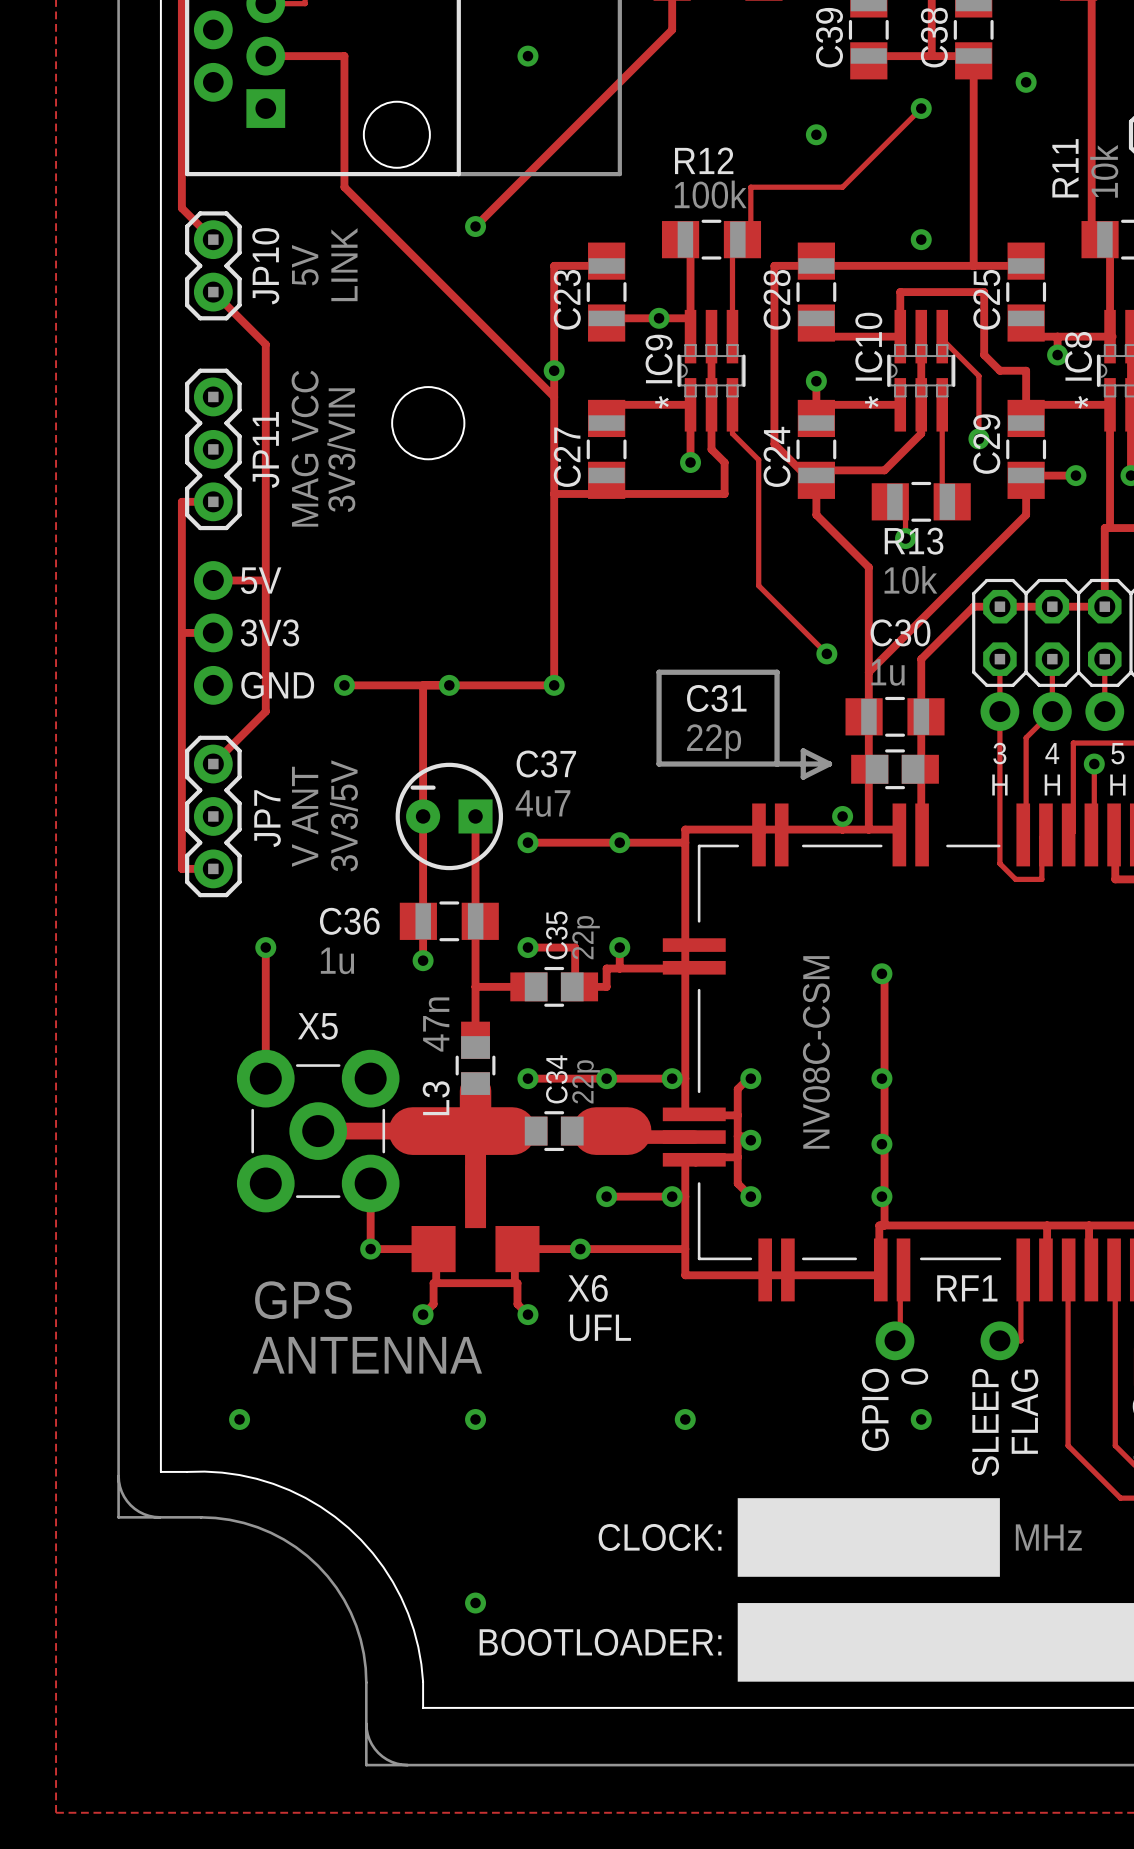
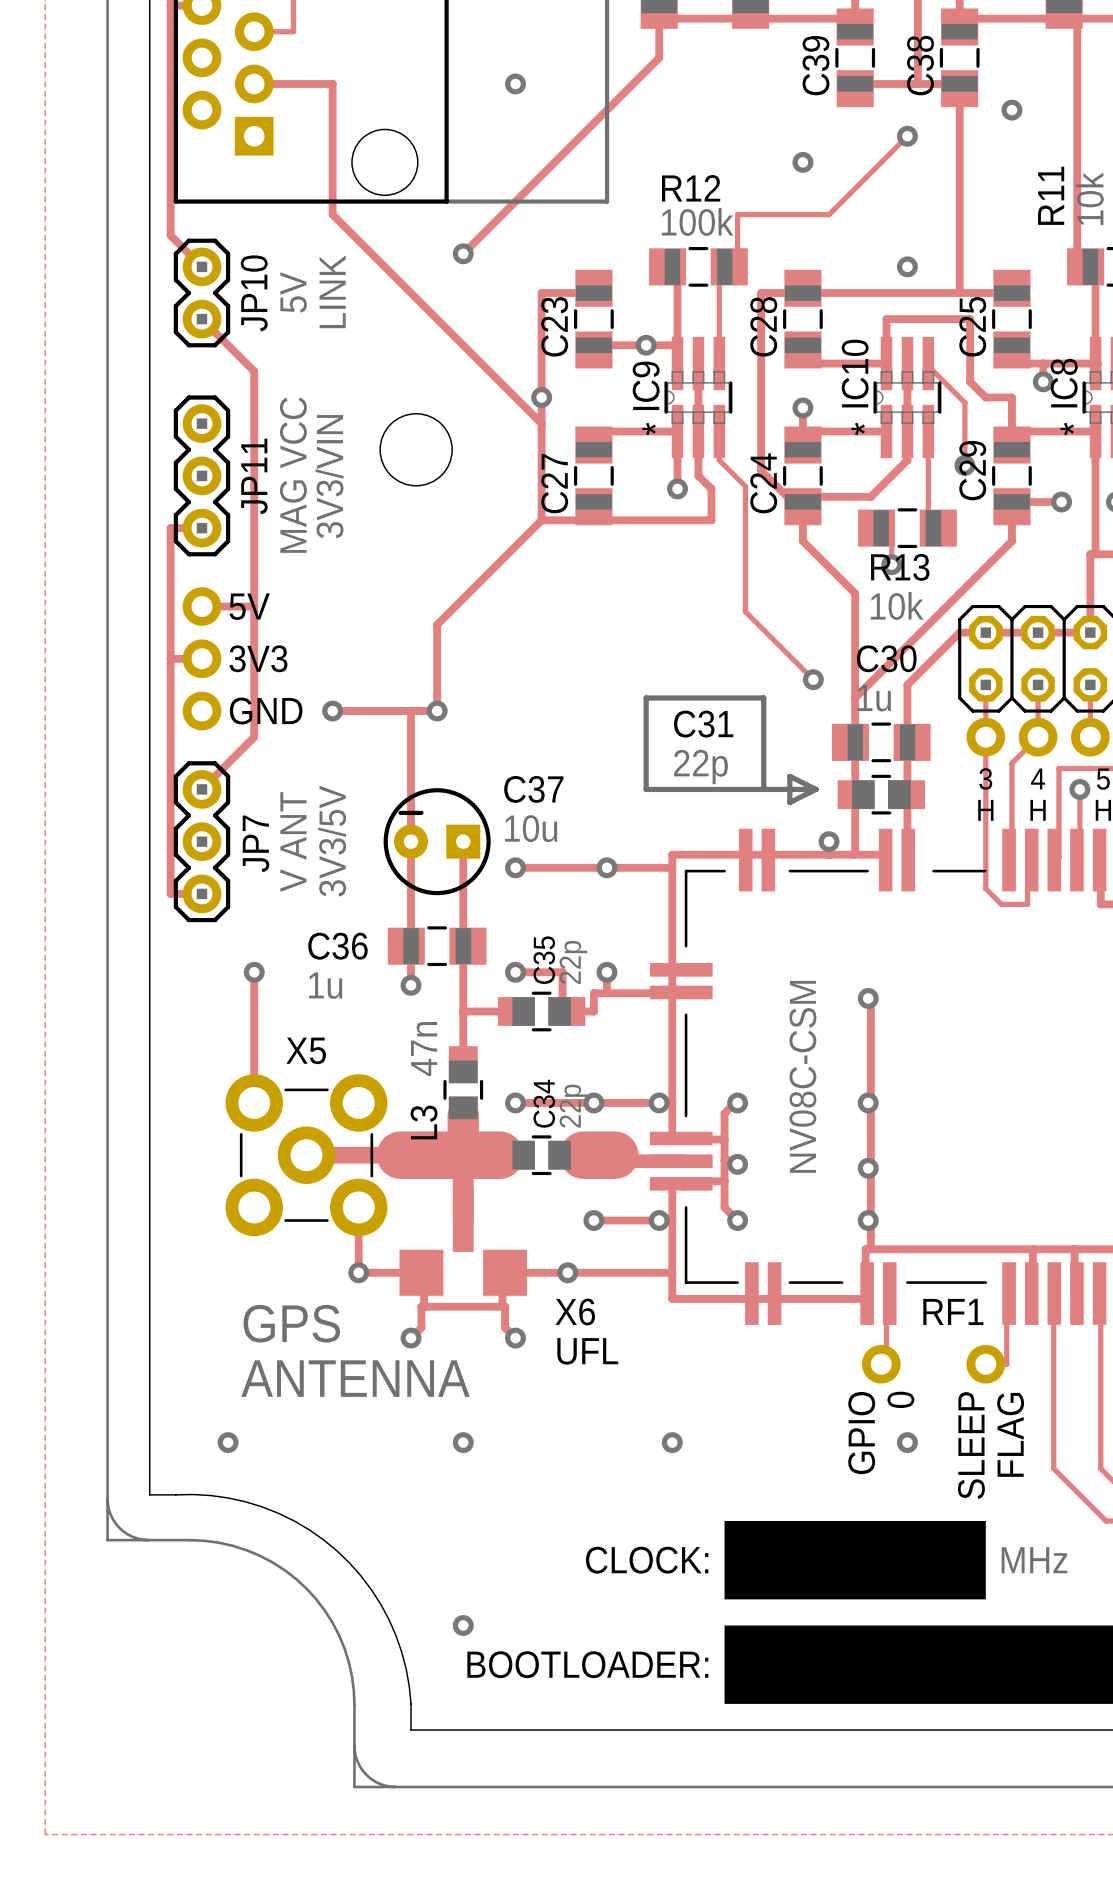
track: (554, 493) (554, 685) (449, 685) -> (541, 520) (437, 624) (437, 711)
via: (554, 685) -> none
C37 value: 4u7 (543, 803) -> 10u (531, 828)

